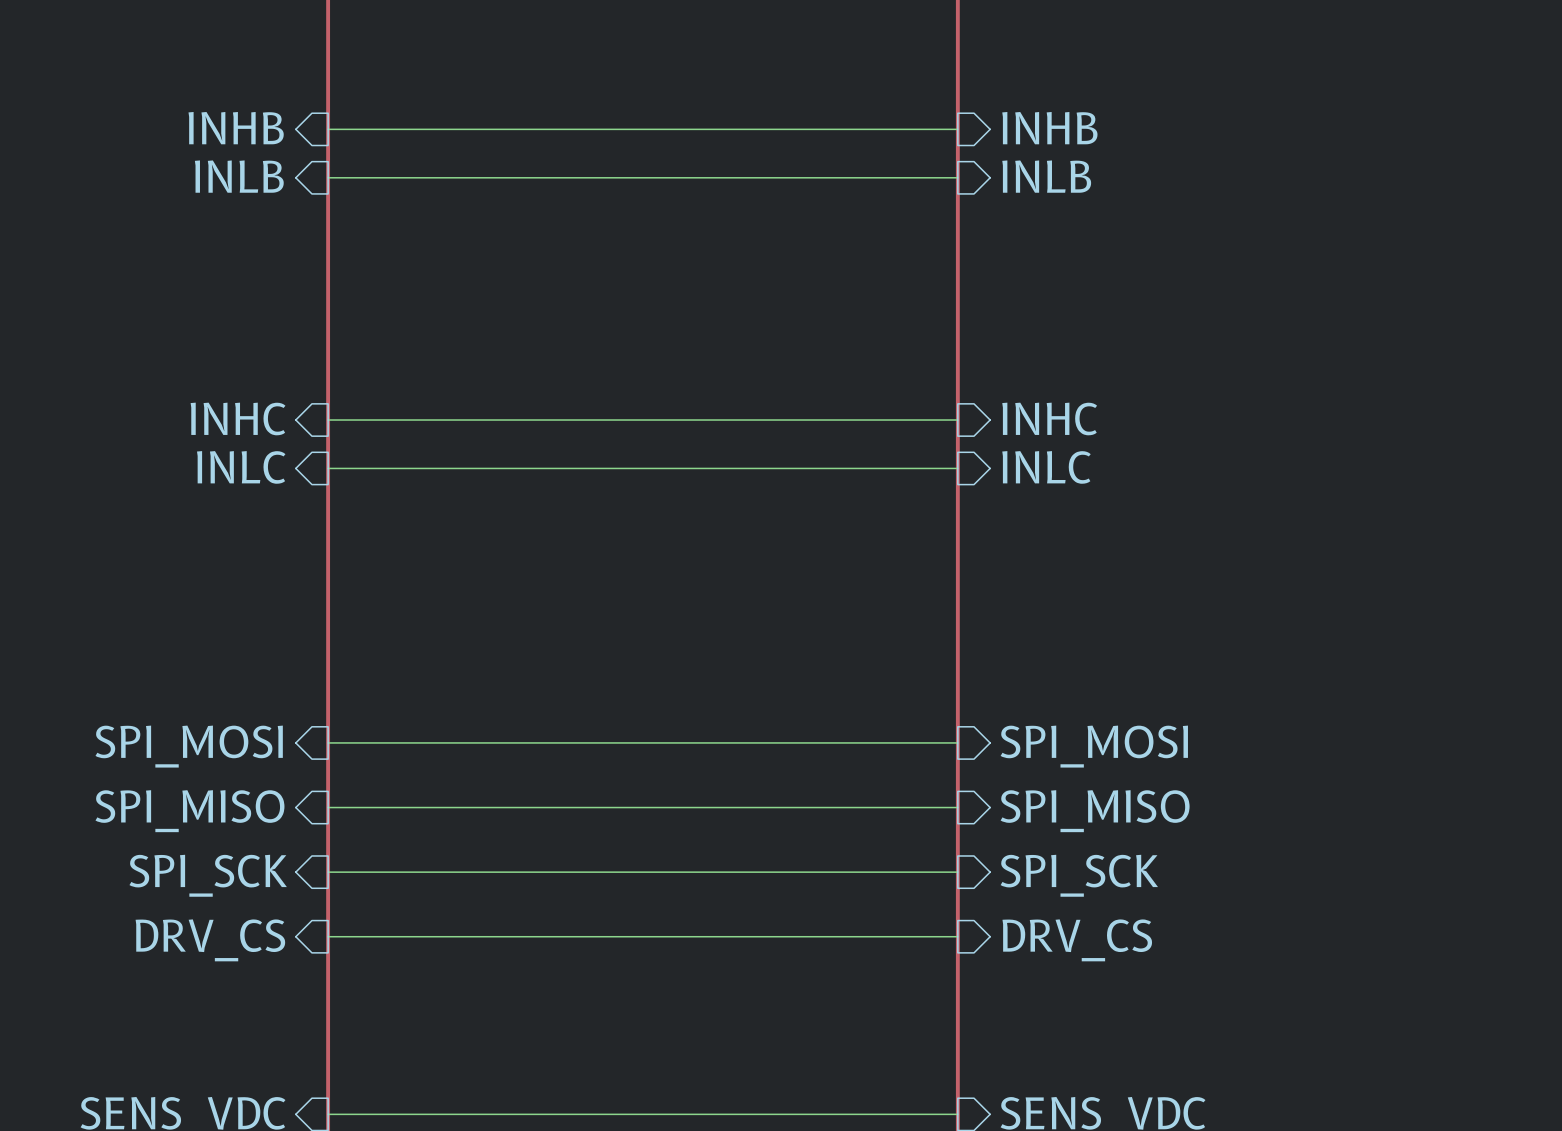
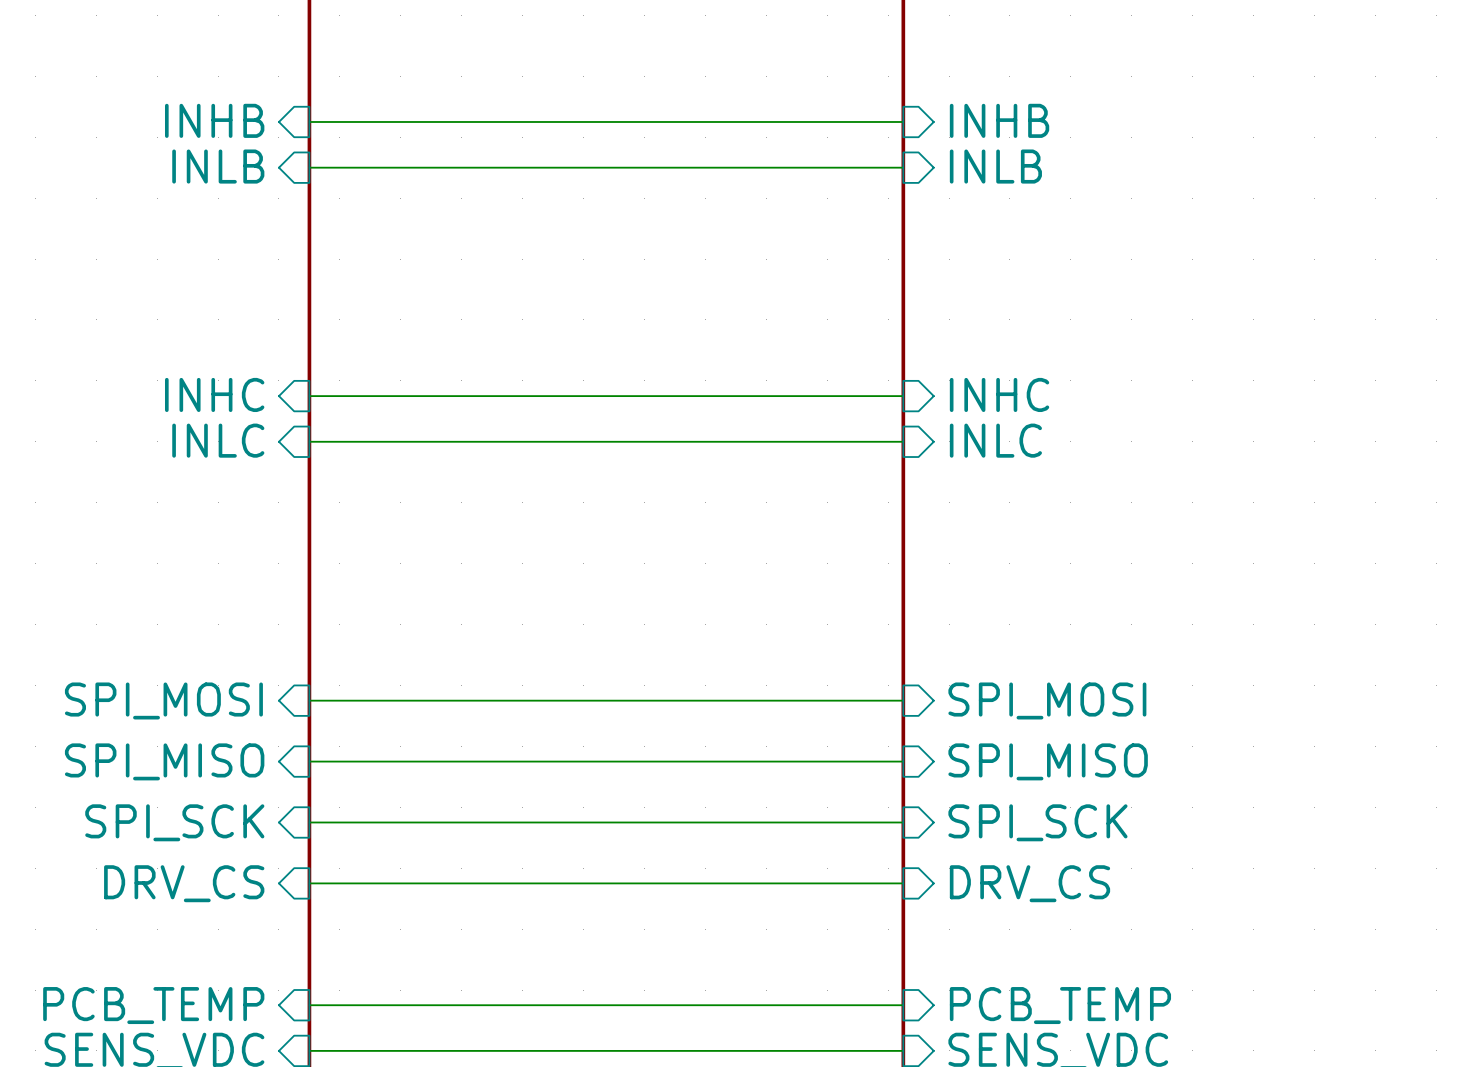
wire: none -> (309, 1005) (903, 1005)
sheet pin: none -> PCB_TEMP (153, 1005)
sheet pin: none -> PCB_TEMP (1060, 1005)

